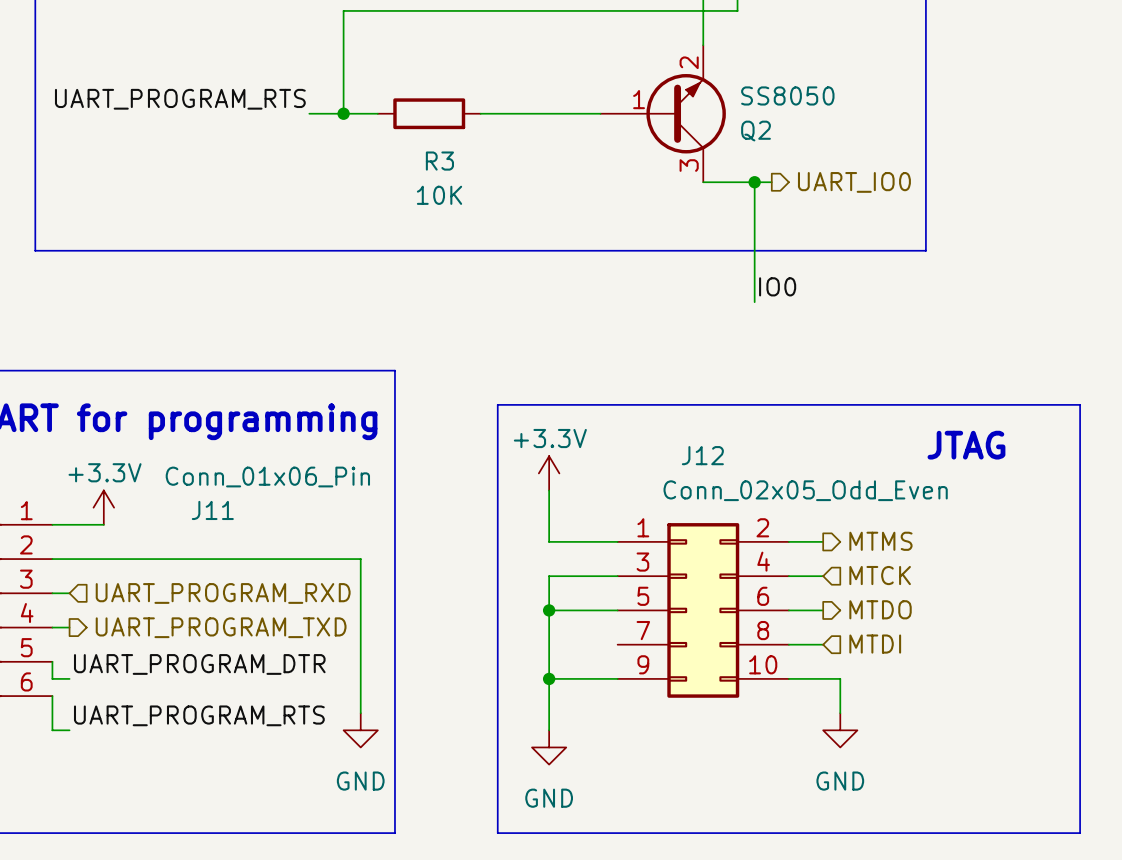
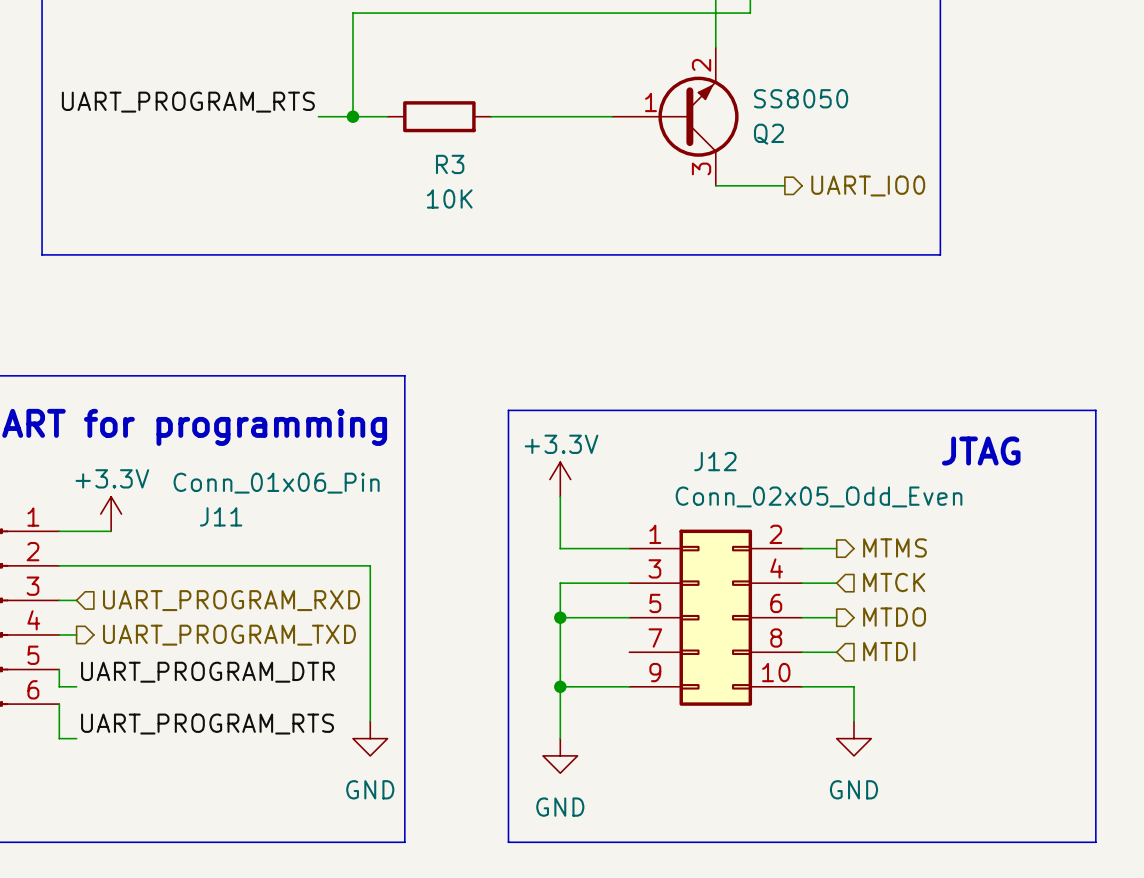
wire: (754, 182) (754, 302) -> none
junction: (754, 182) -> none
label: IO0 (777, 286) -> none

